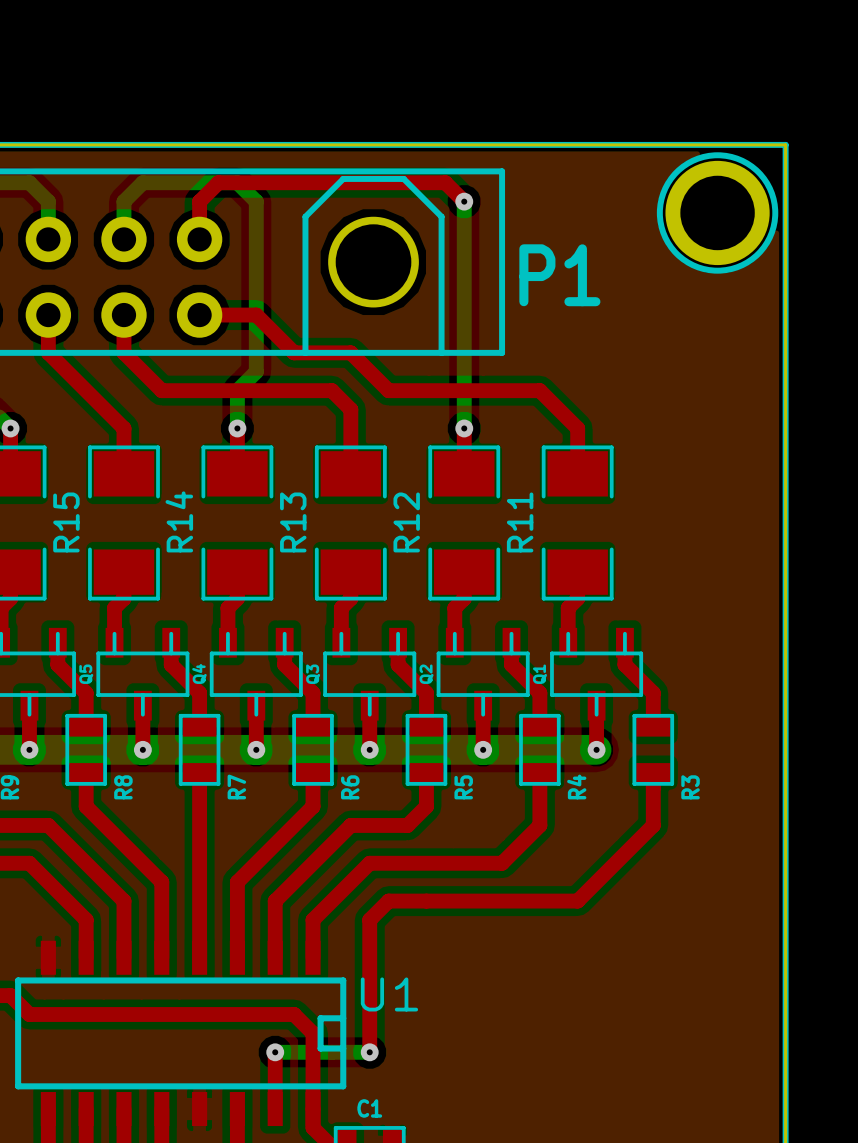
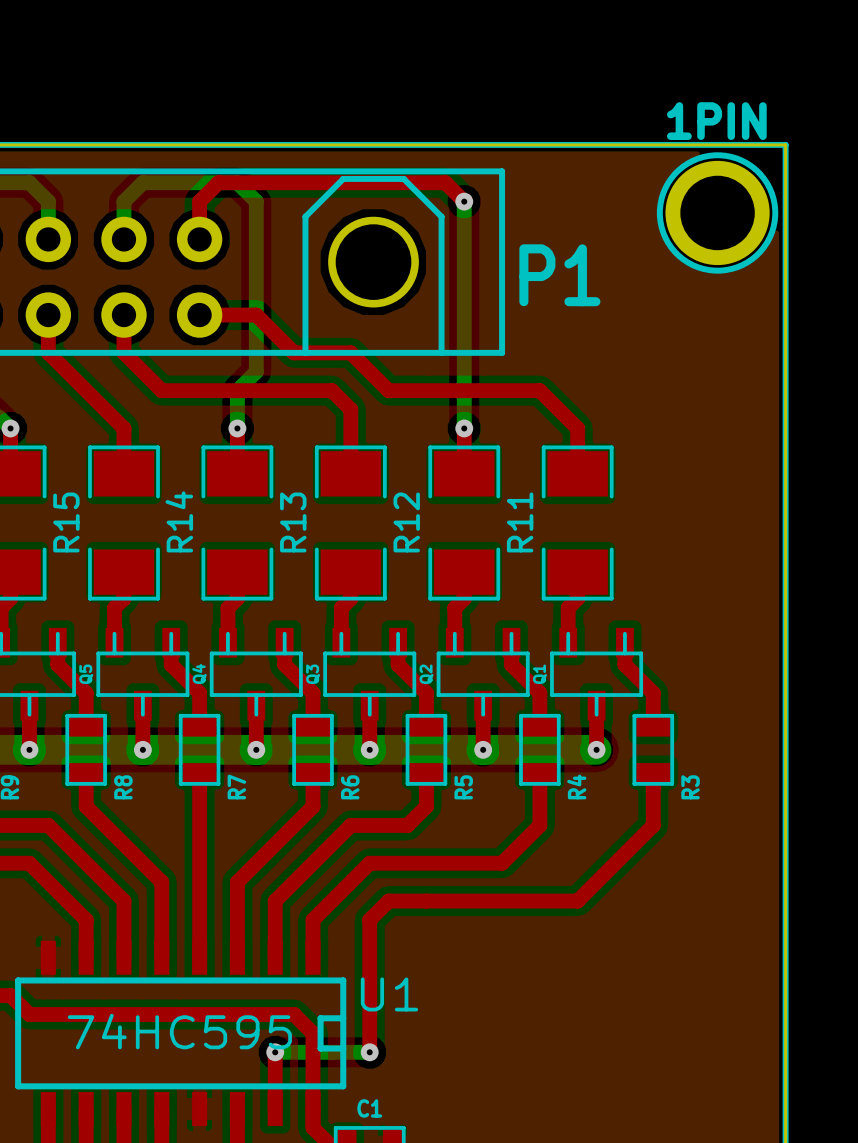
1PIN name: none -> 1PIN (716, 121)
U1 value: none -> 74HC595 (179, 1031)

